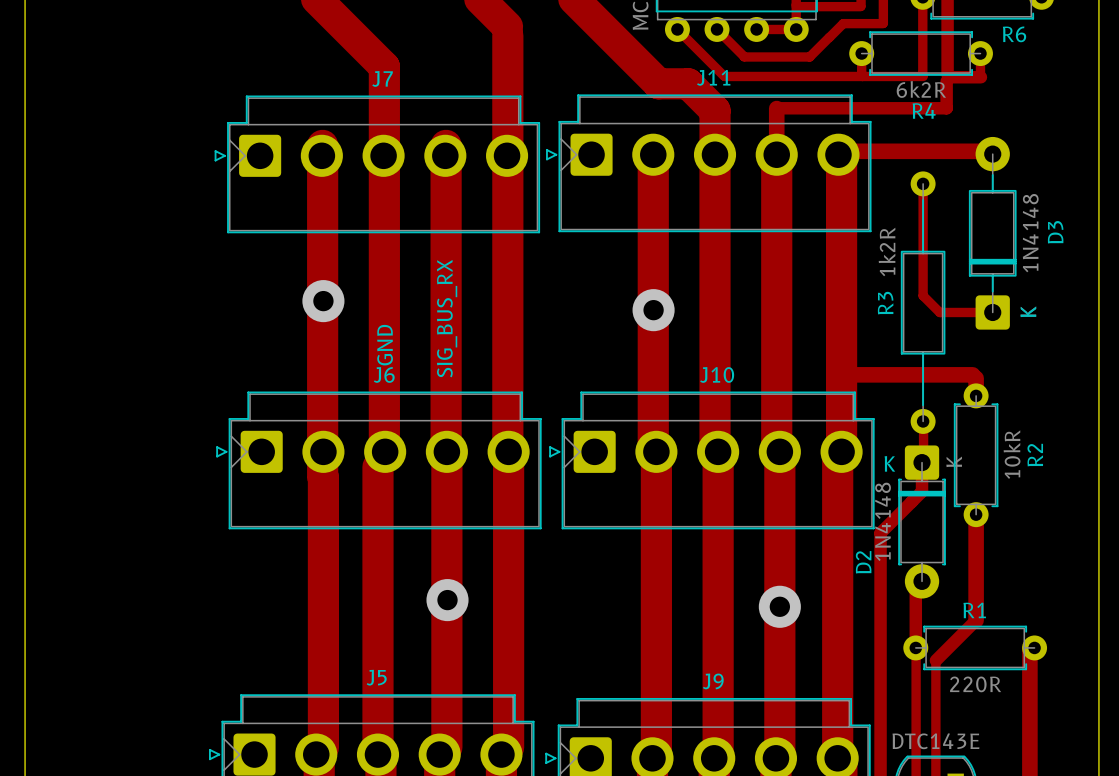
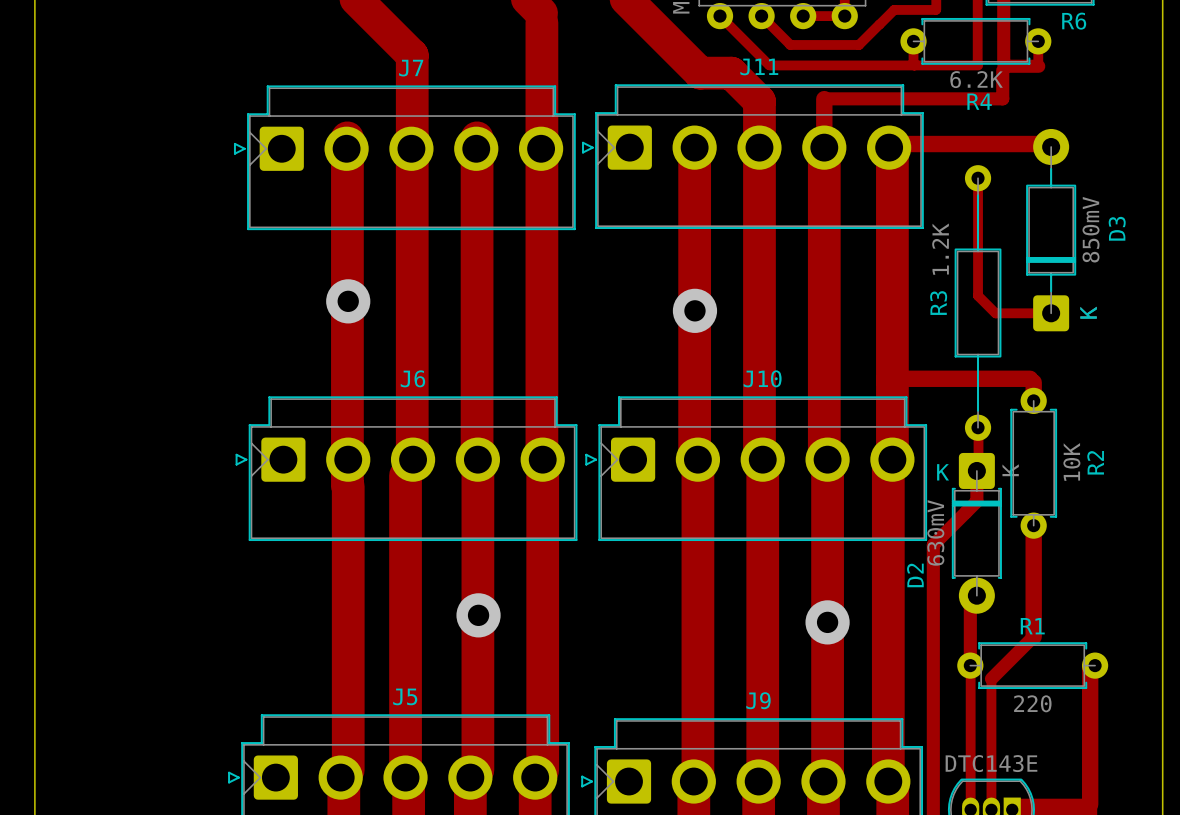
R4 value: 6k2R (921, 89) -> 6.2K (976, 79)
D3 value: 1N4148 (1030, 233) -> 850mV (1090, 229)
R3 value: 1k2R (887, 251) -> 1.2K (940, 249)
text: SIG_BUS_RX (447, 318) -> none
text: GND (385, 345) -> none
R2 value: 10kR (1012, 454) -> 10K (1071, 461)
D2 value: 1N4148 (883, 521) -> 630mV (935, 532)
R1 value: 220R (975, 684) -> 220 (1032, 703)

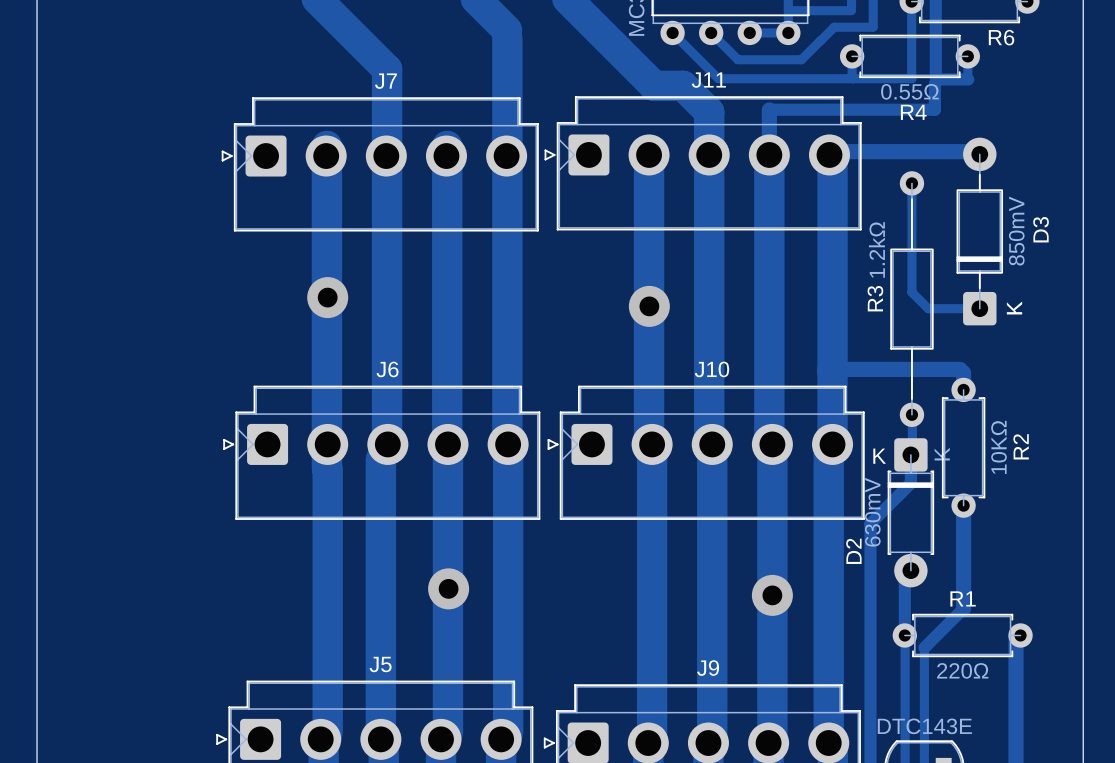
R4 value: 6.2K (976, 79) -> 0.55Ω (909, 91)
R3 value: 1.2K (940, 249) -> 1.2kΩ (876, 249)
R2 value: 10K (1071, 461) -> 10KΩ (999, 447)
R1 value: 220 (1032, 703) -> 220Ω (962, 670)

